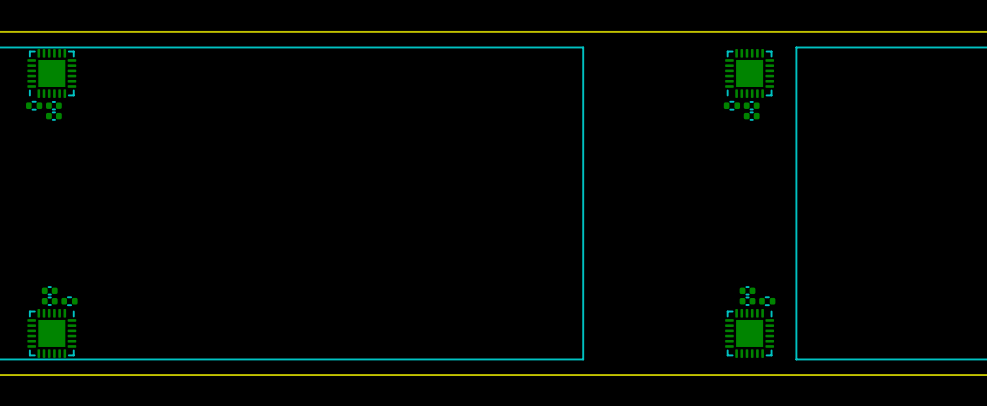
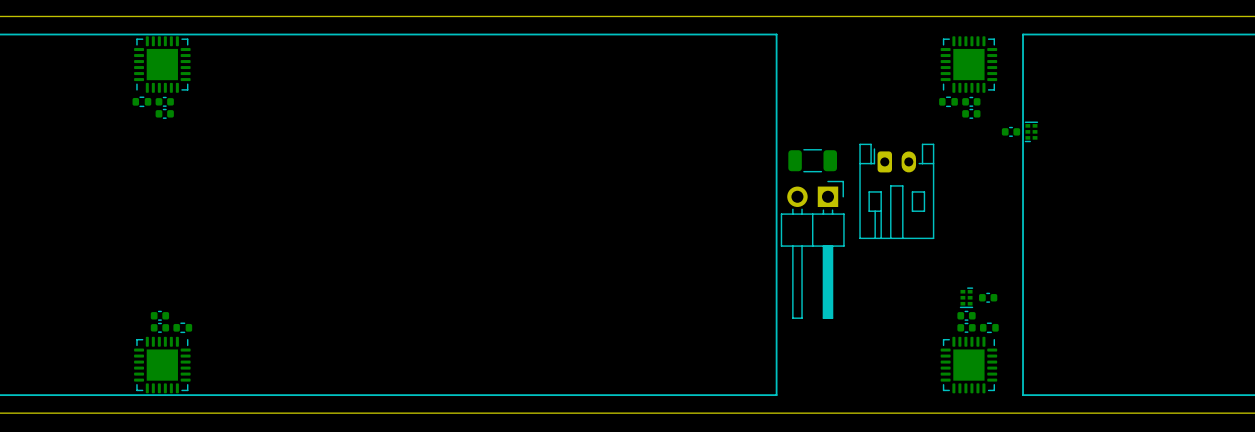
part: none -> (1010, 131)
part: none -> (1031, 131)
part: none -> (812, 160)
part: none -> (896, 191)
part: none -> (812, 249)
part: none -> (966, 297)
part: none -> (988, 297)

